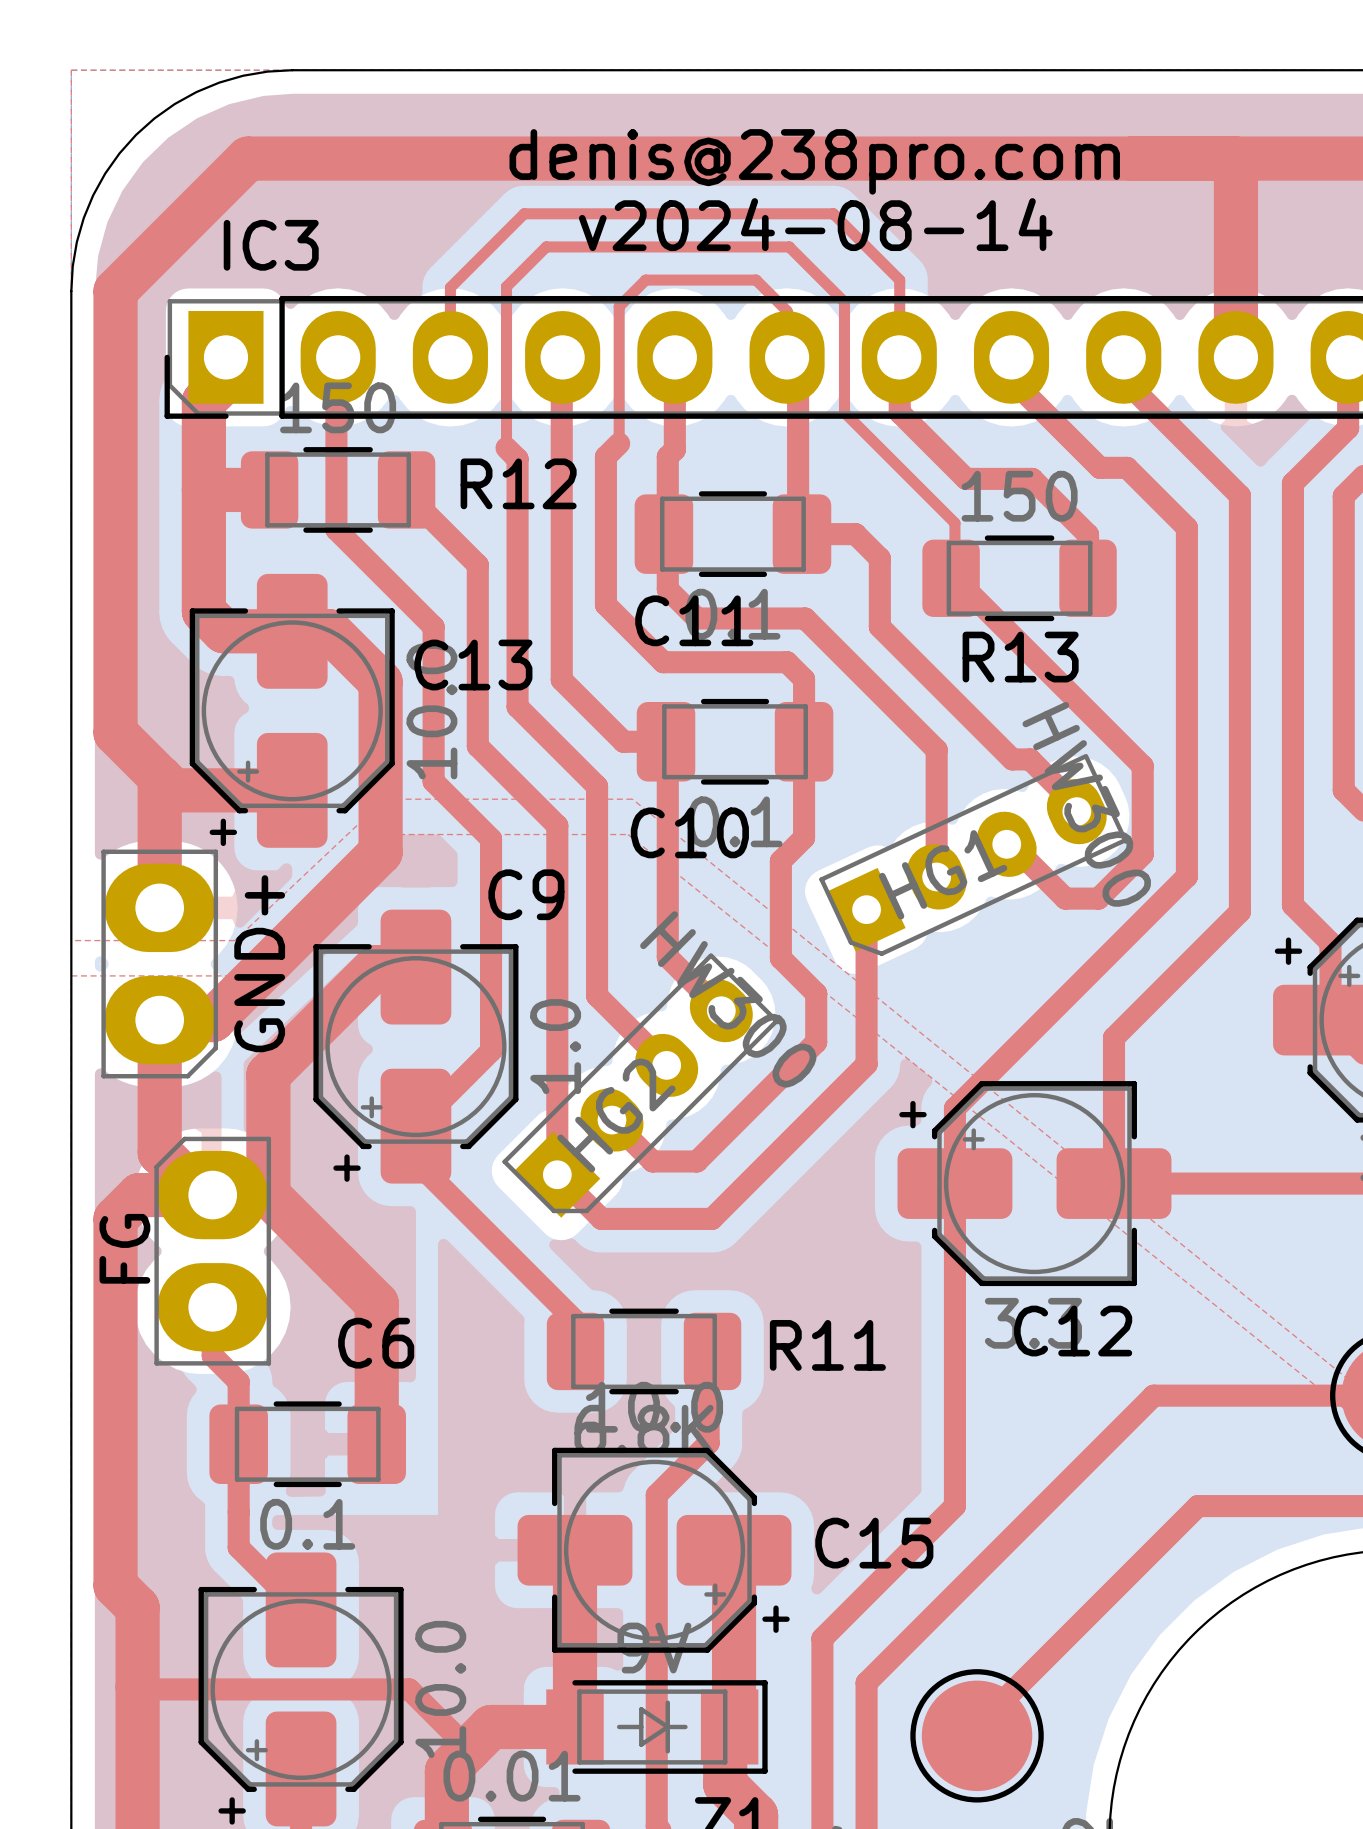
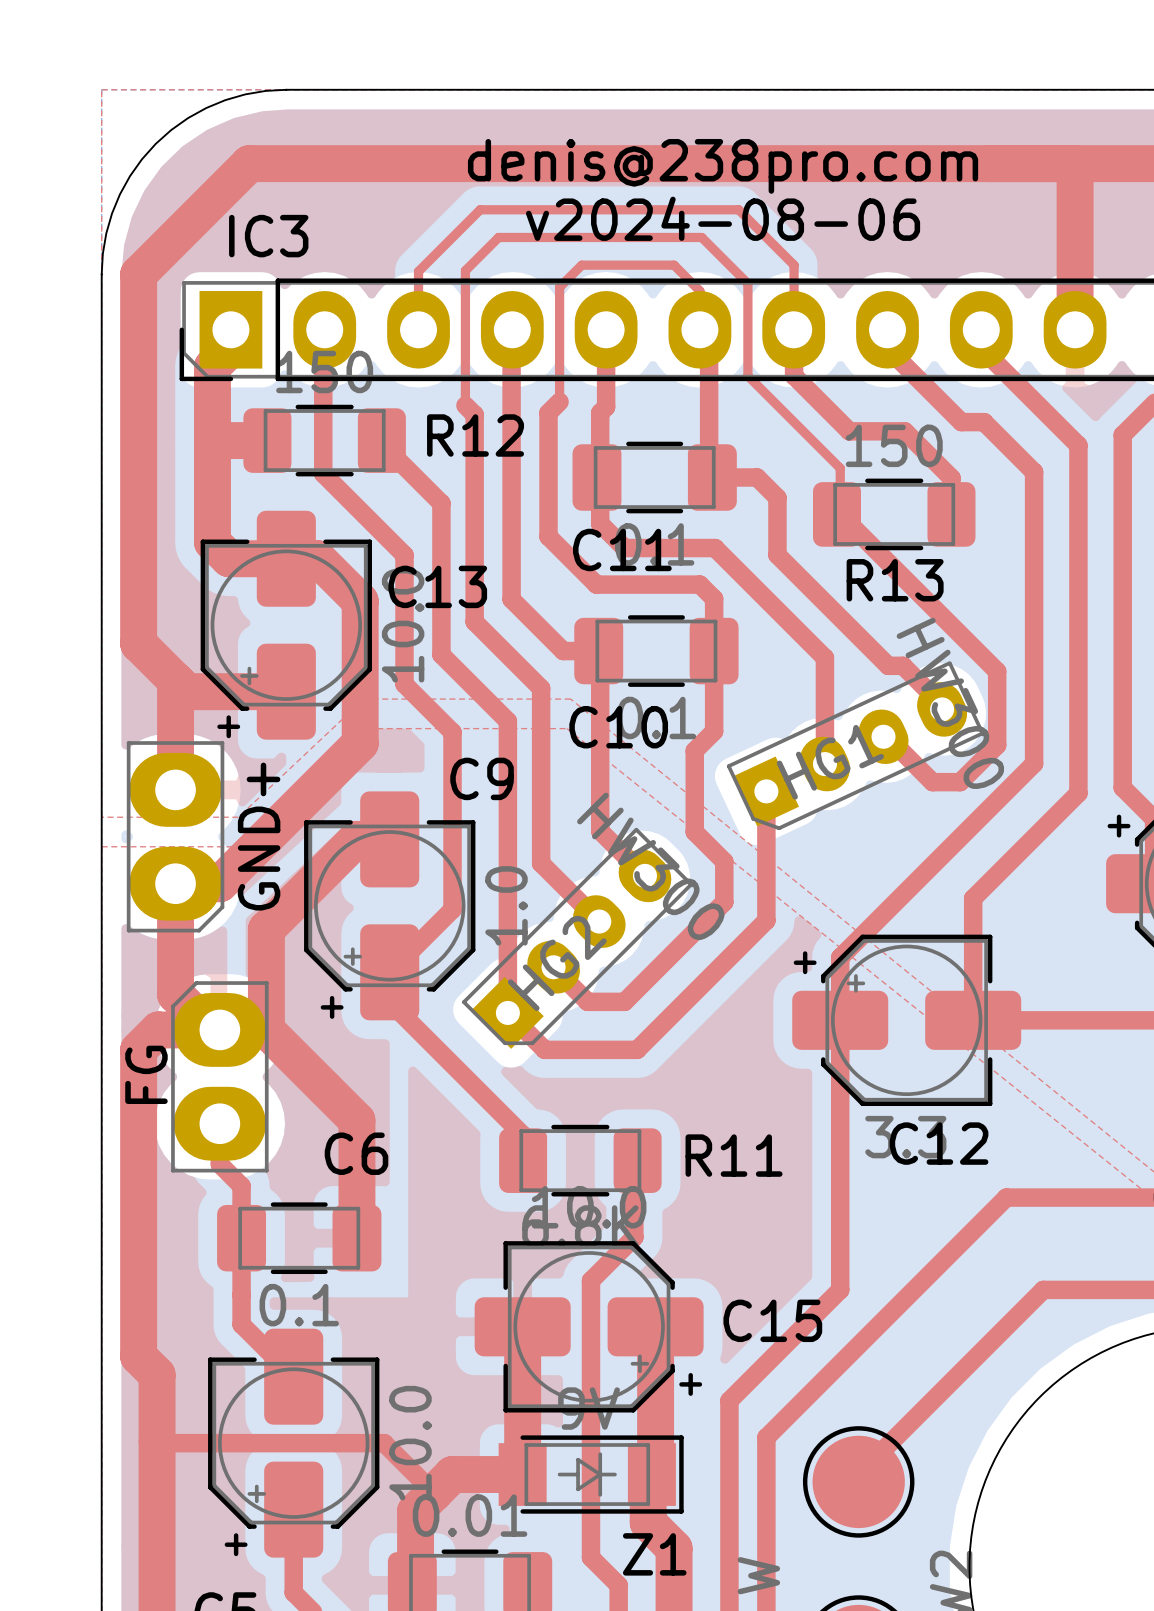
text: v2024-08-14 (815, 224) -> v2024-08-06 (723, 218)

